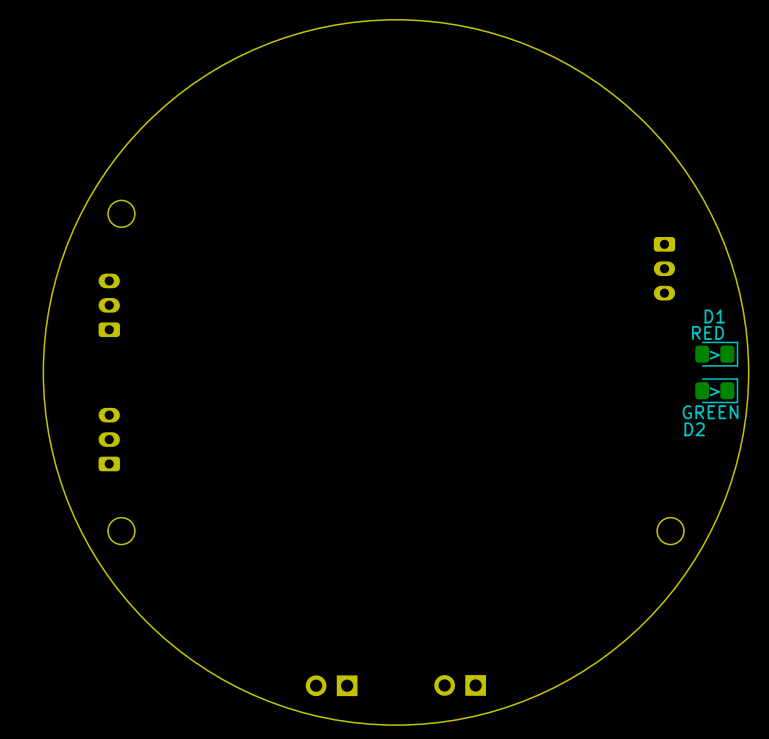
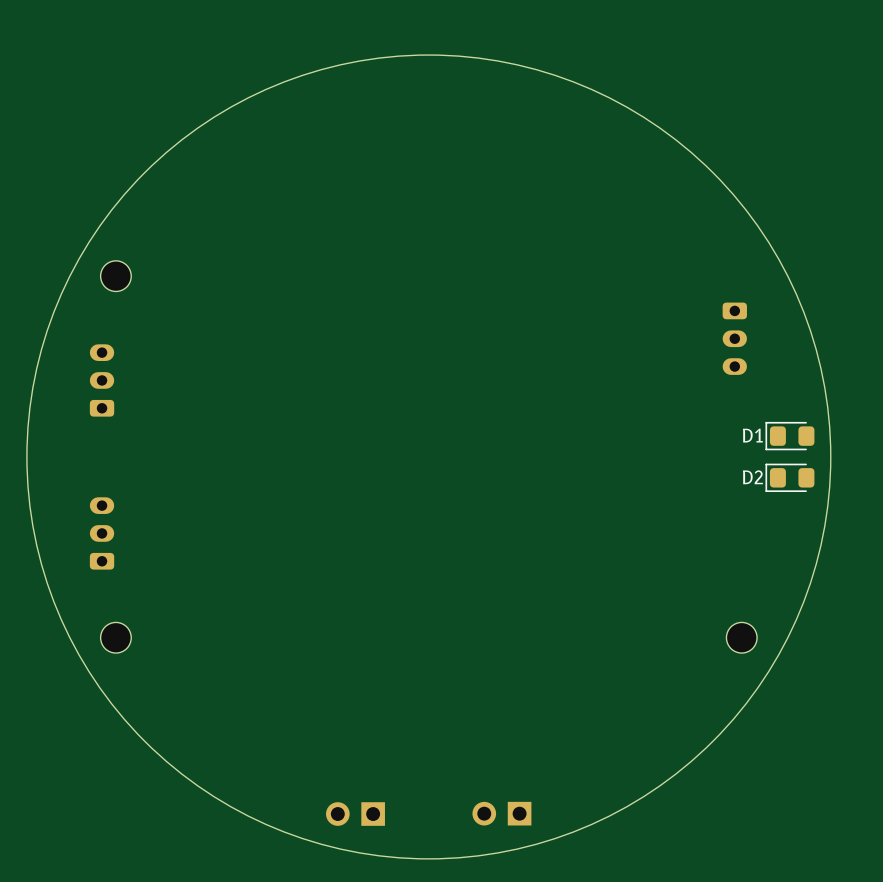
D1 name position: D1 (714, 316) -> D1 (752, 435)
D1 value: RED (708, 332) -> none
D1 rotation: 0° (716, 354) -> 180° (789, 436)
D1 text: > (714, 355) -> none
D2 rotation: 0° (716, 390) -> 180° (789, 477)
D2 text: > (714, 391) -> none
D2 value: GREEN (710, 412) -> none
D2 name position: D2 (694, 429) -> D2 (752, 477)

